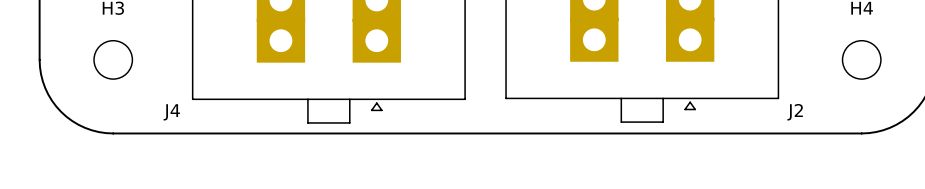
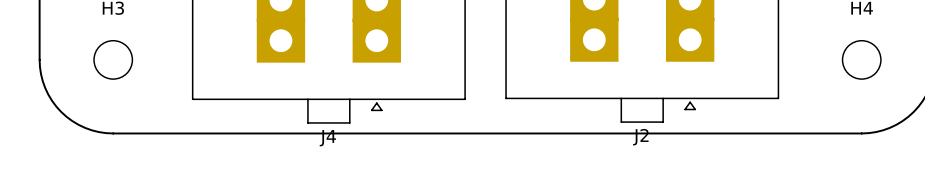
J4 name position: J4 (171, 112) -> J4 (327, 138)
J2 name position: J2 (795, 112) -> J2 (640, 137)

